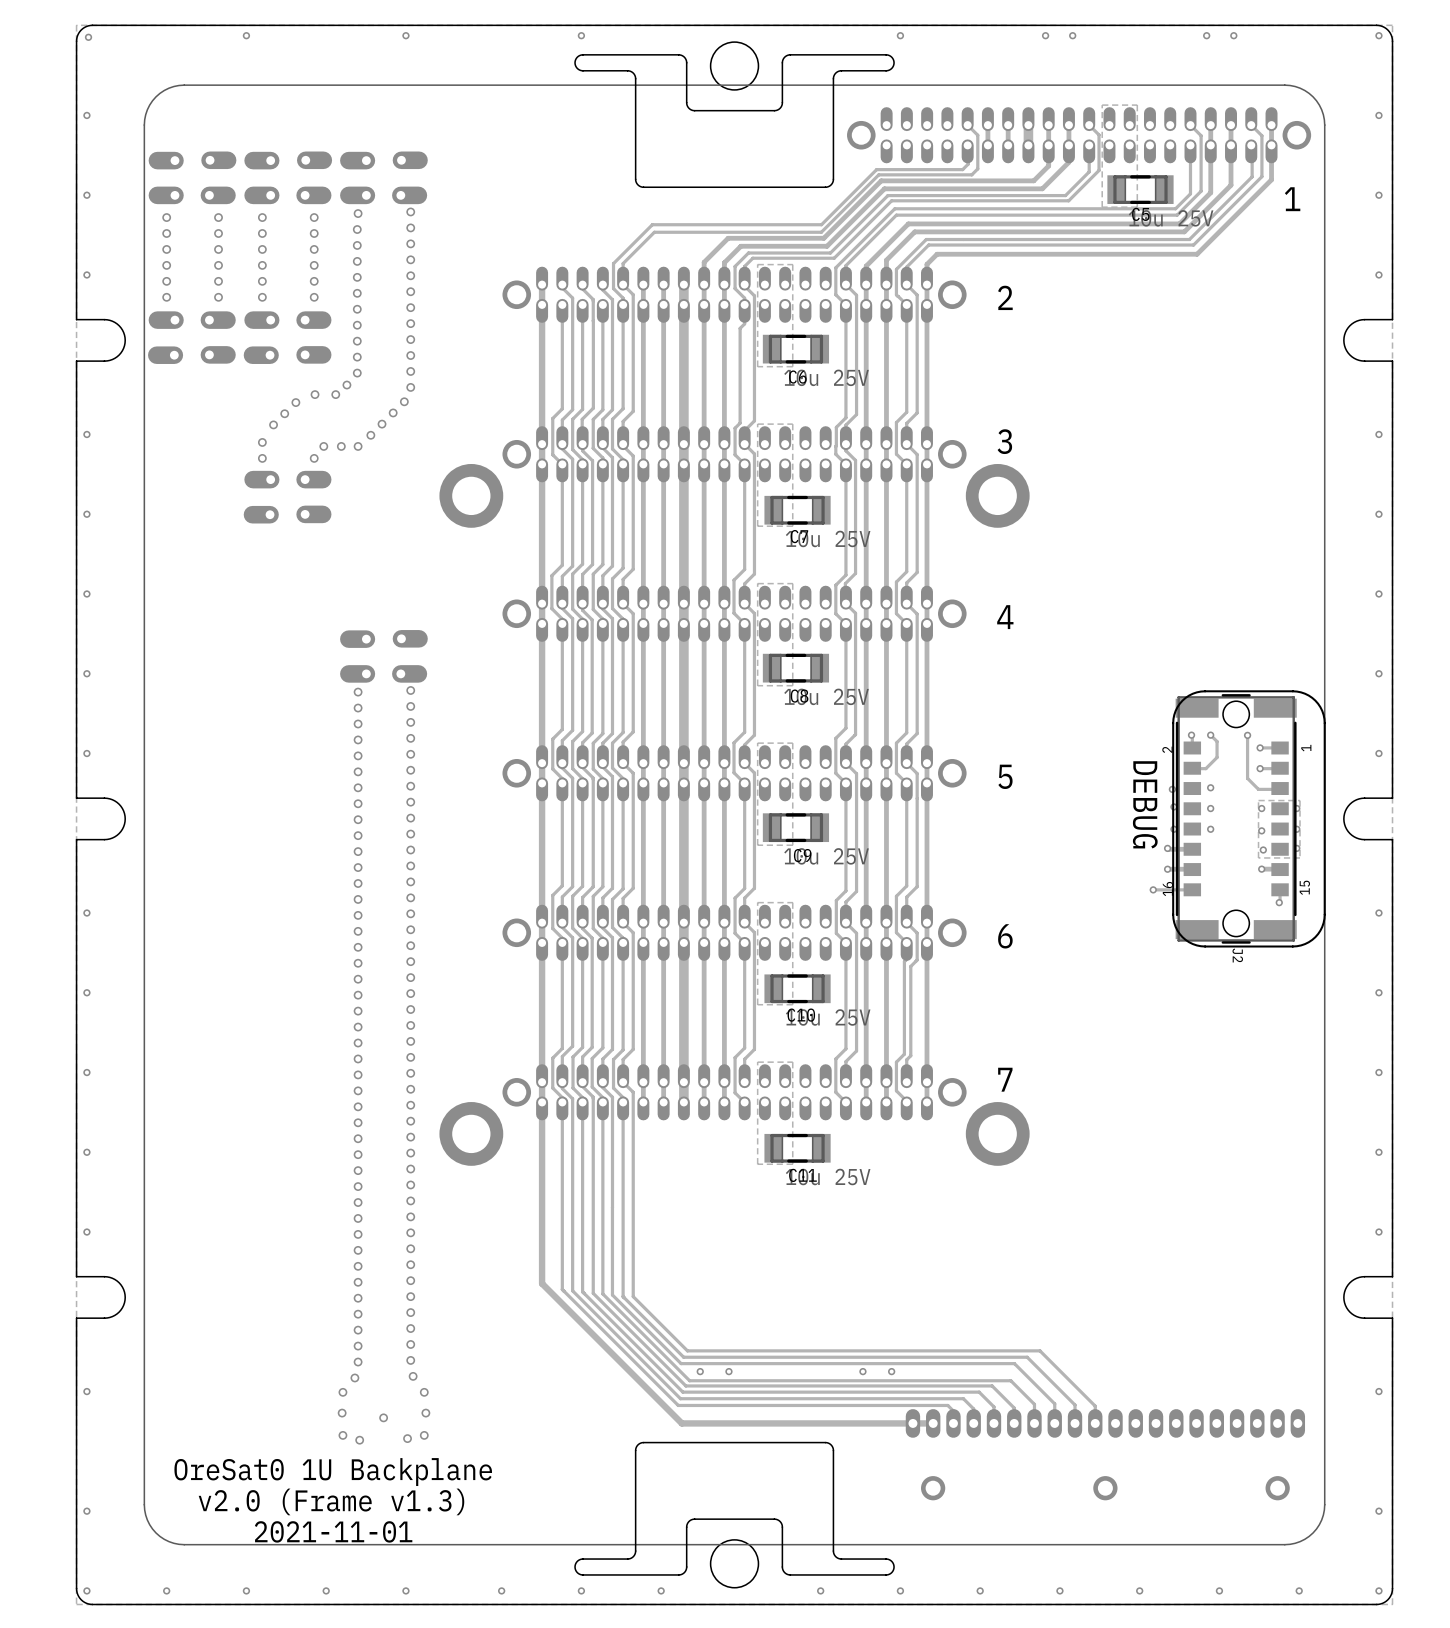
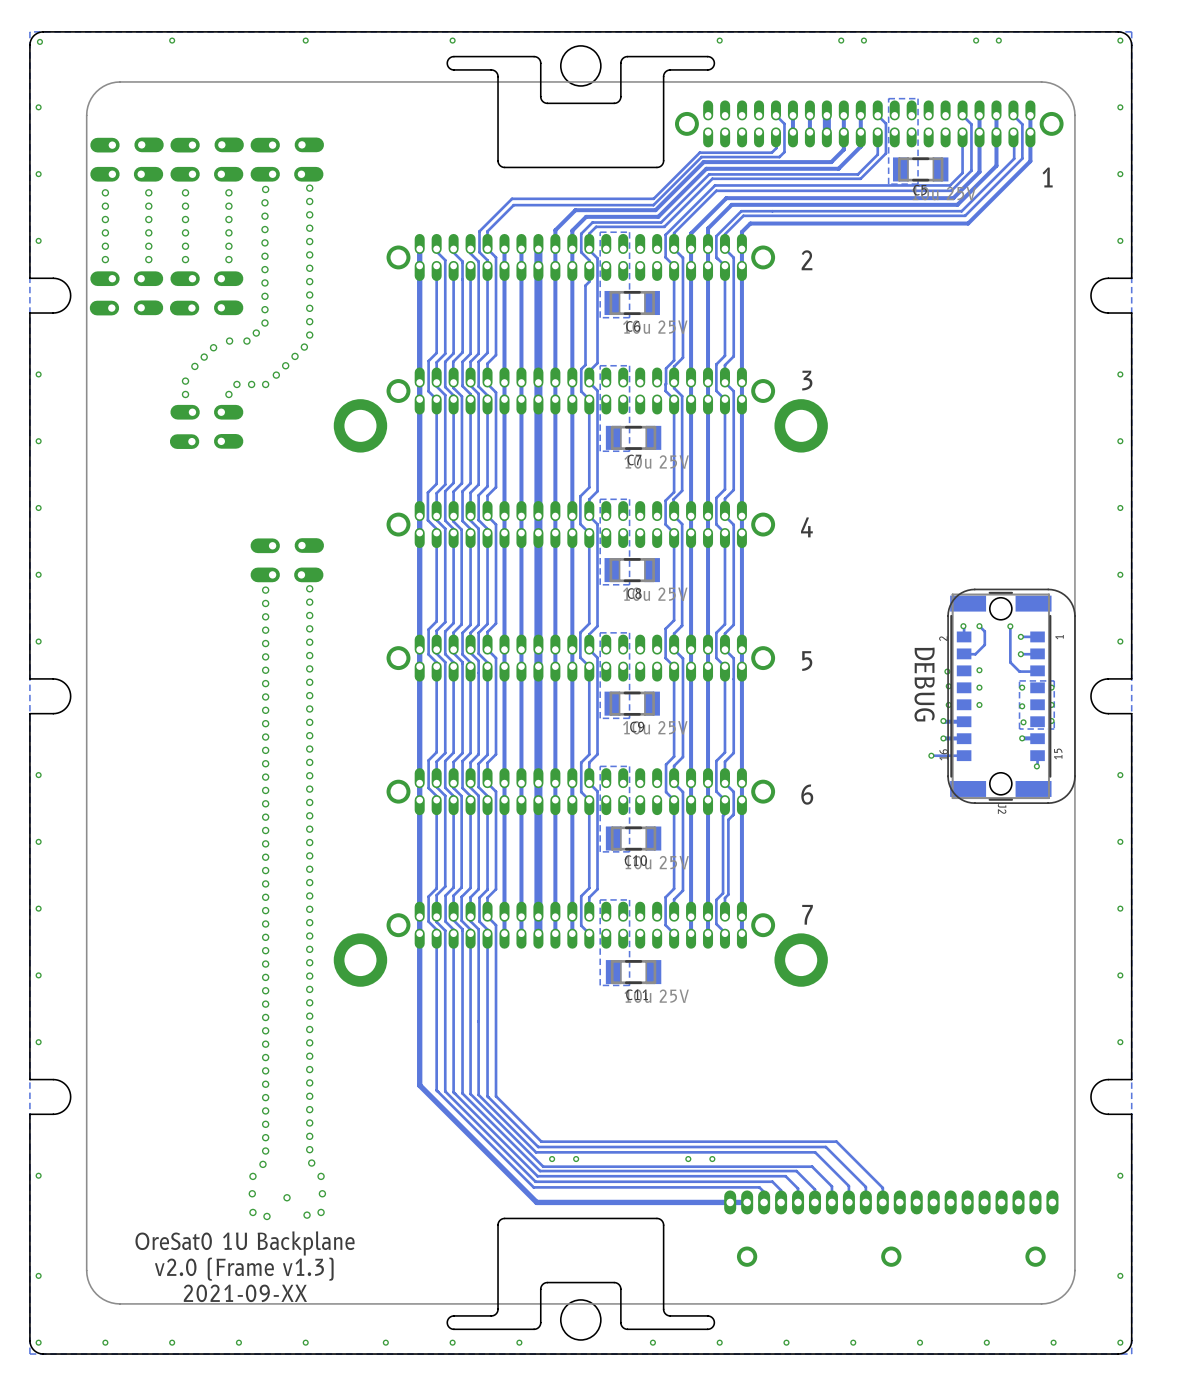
text: 2021-11-01 (333, 1531) -> 2021-09-XX (245, 1293)

